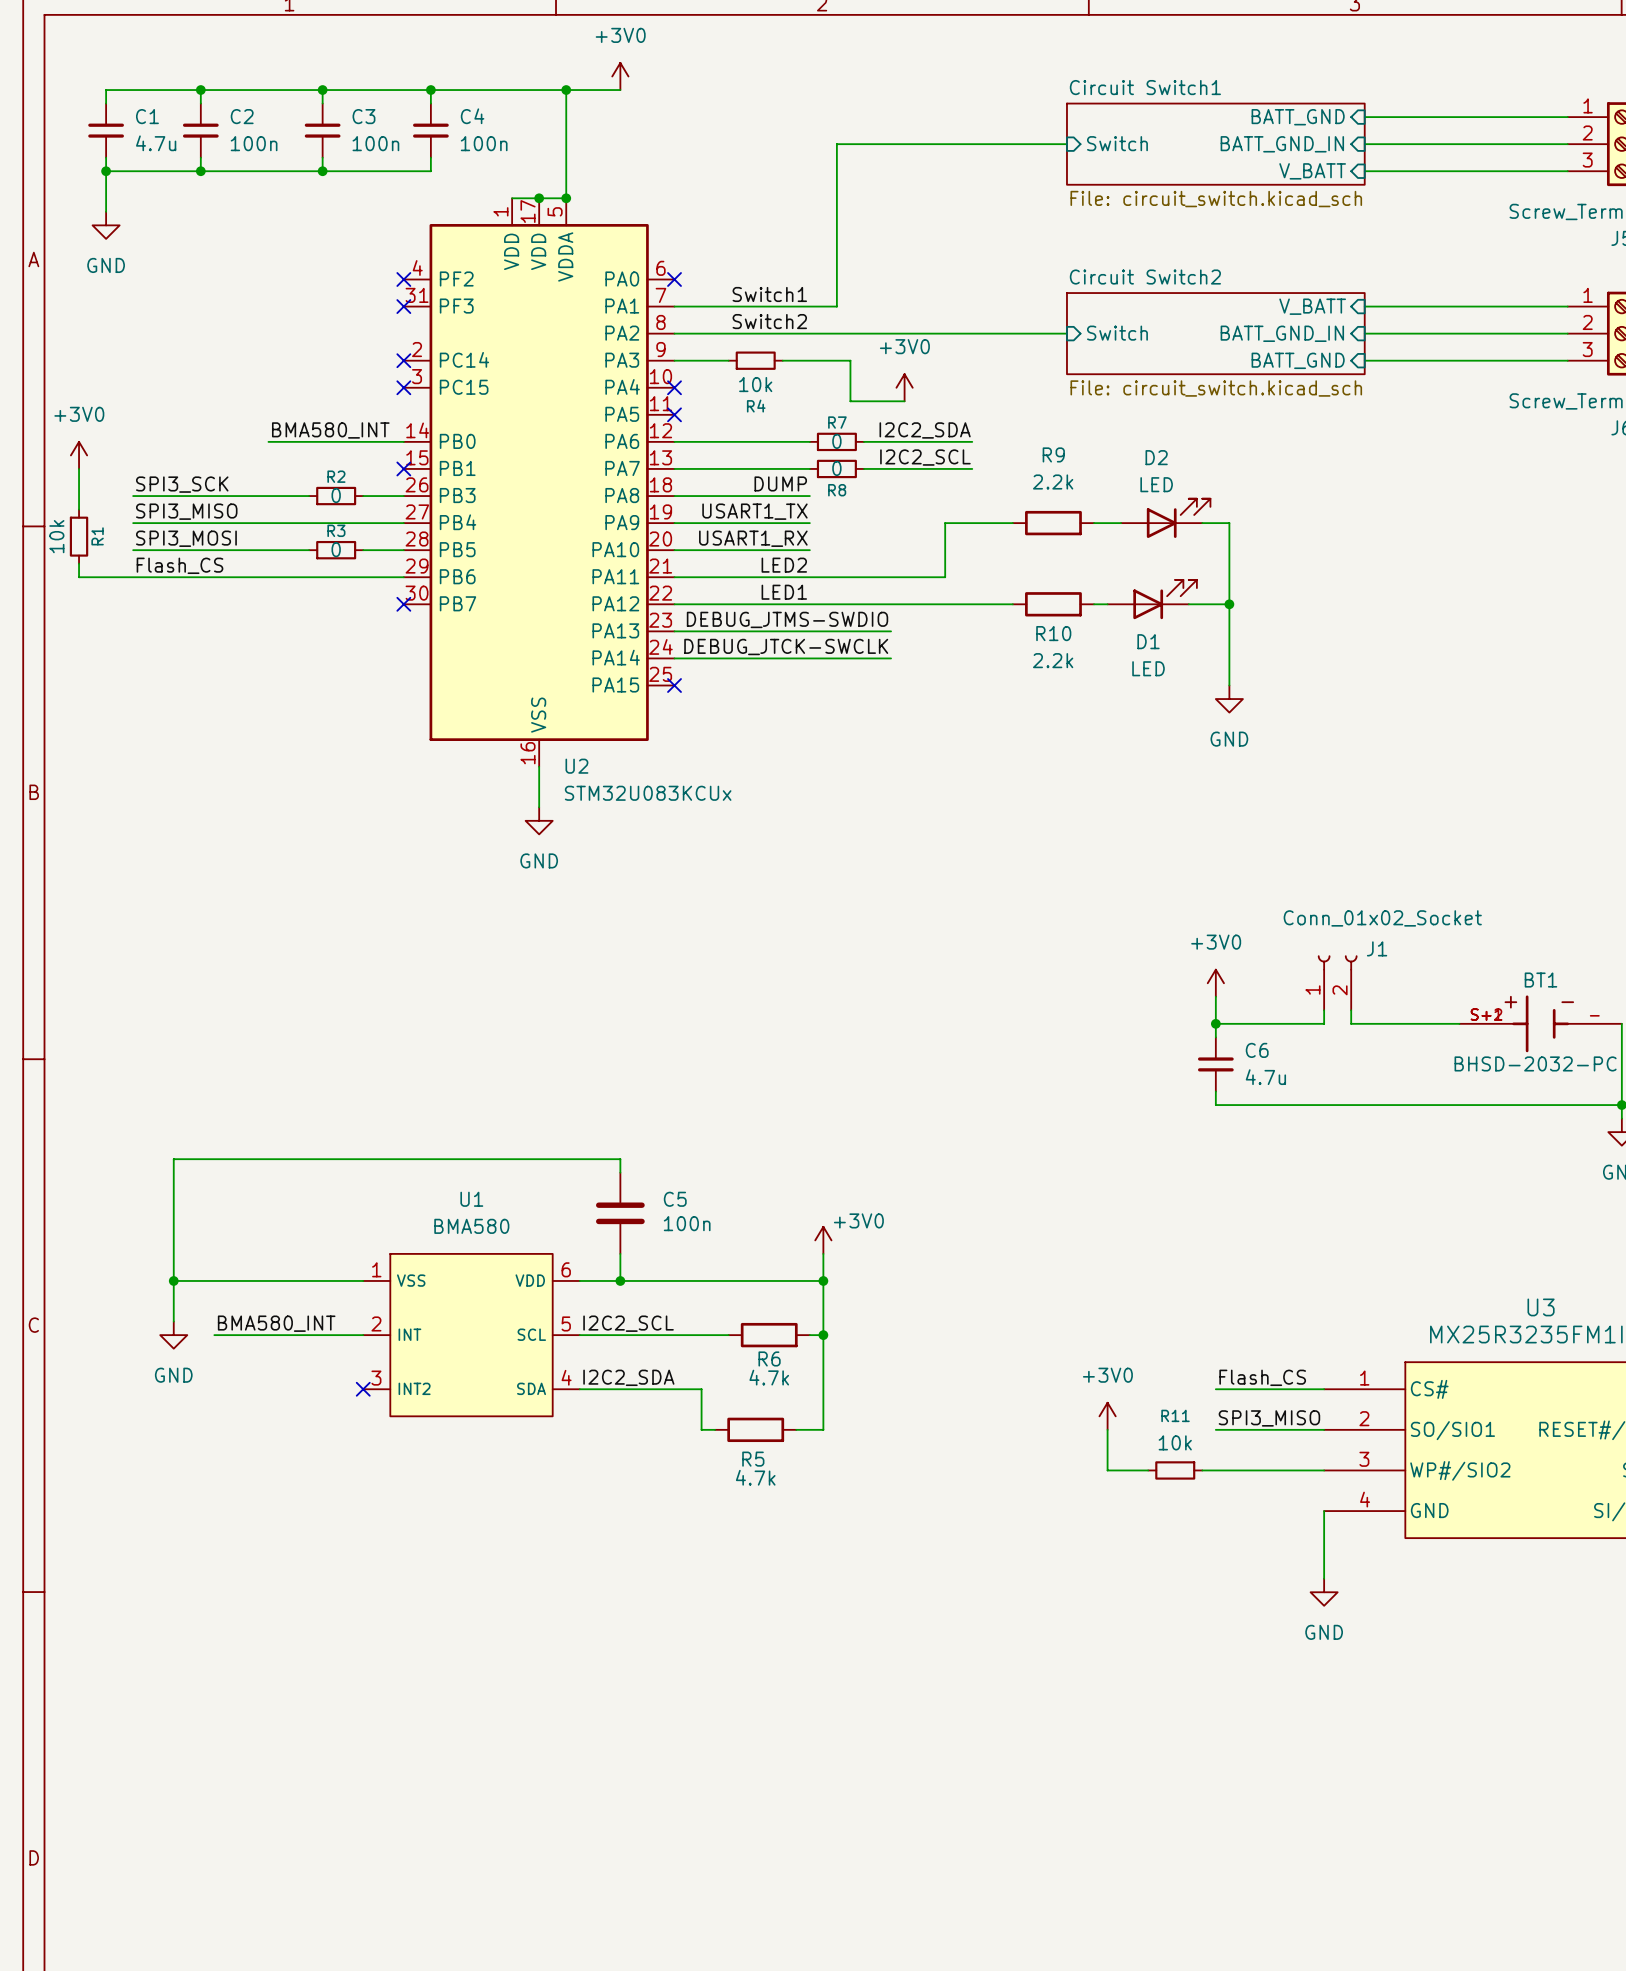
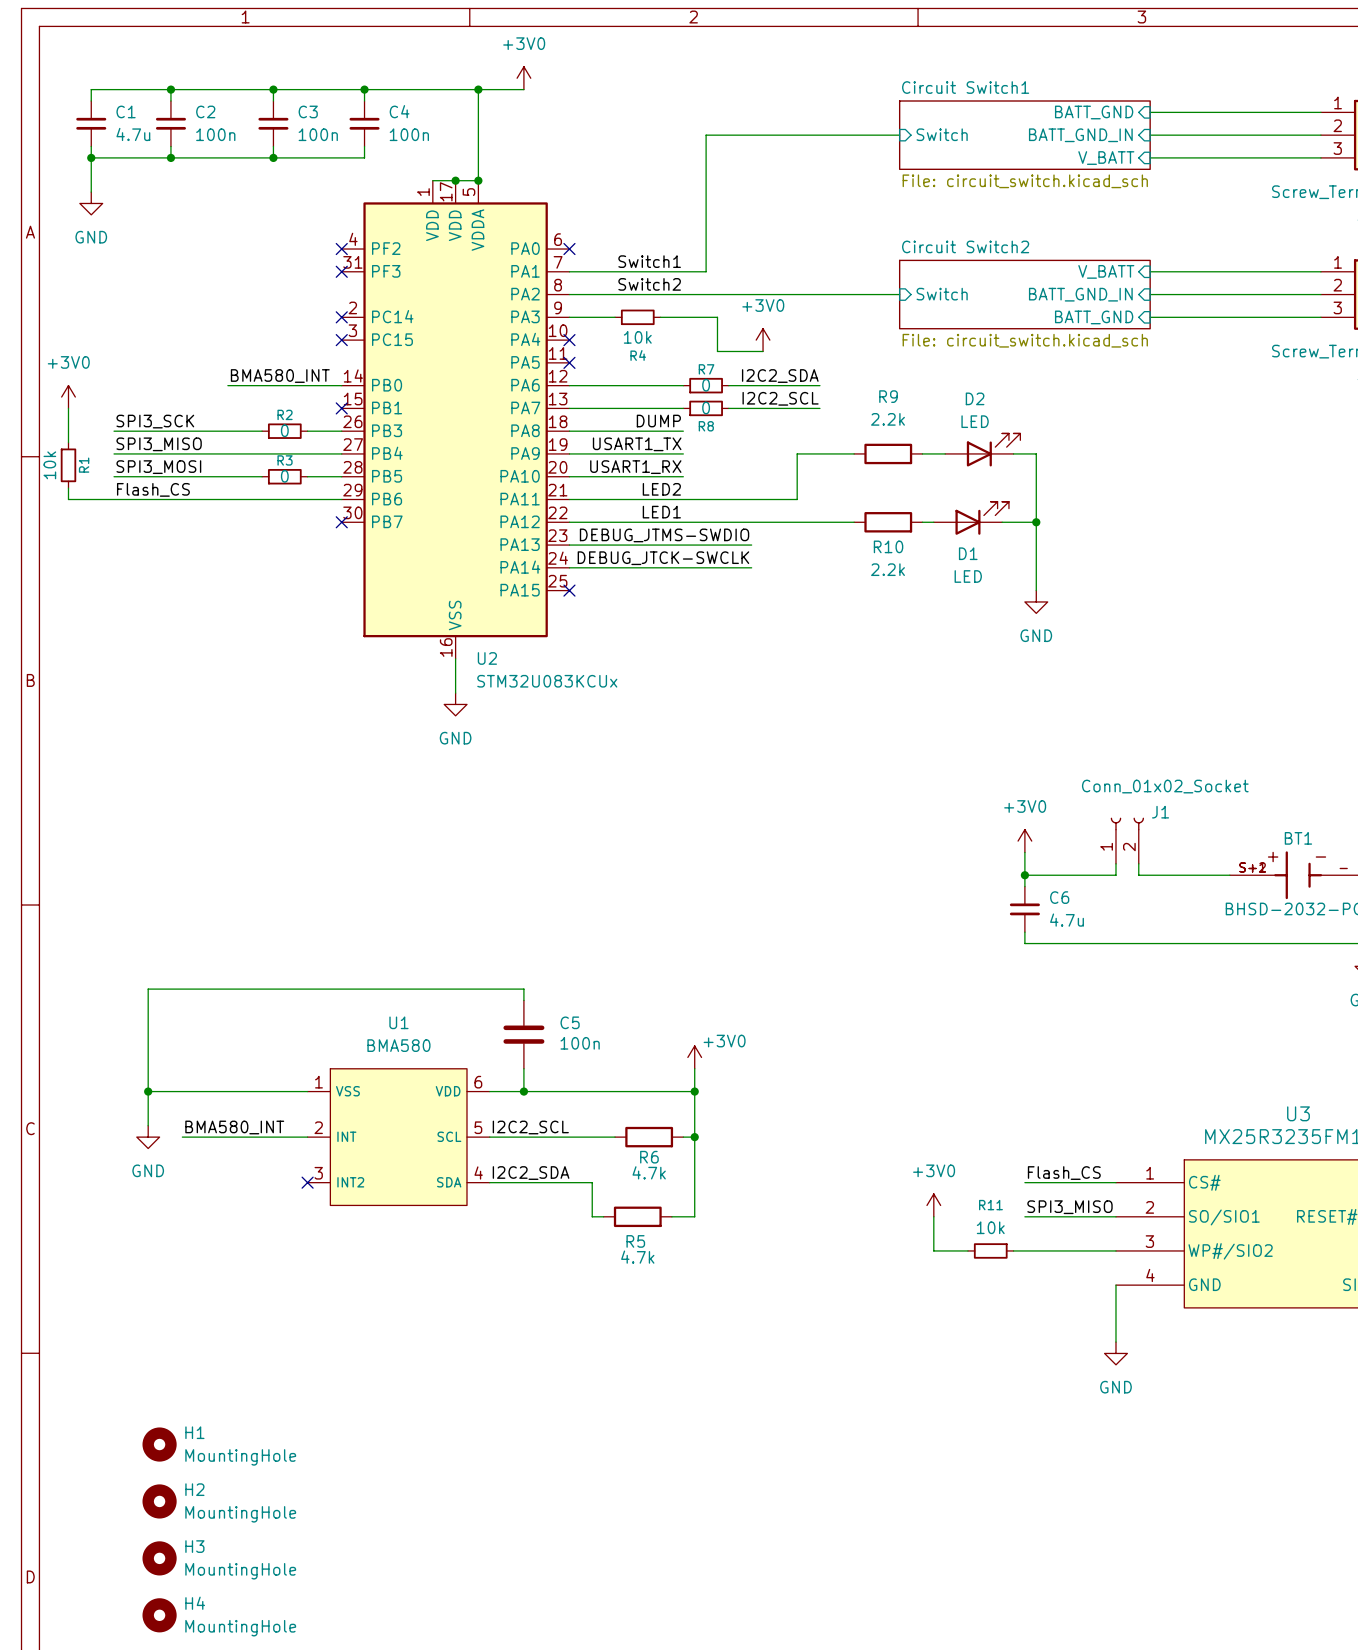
H1: none -> MountingHole (159, 1444)
H2: none -> MountingHole (159, 1501)
H3: none -> MountingHole (159, 1558)
H4: none -> MountingHole (159, 1615)

